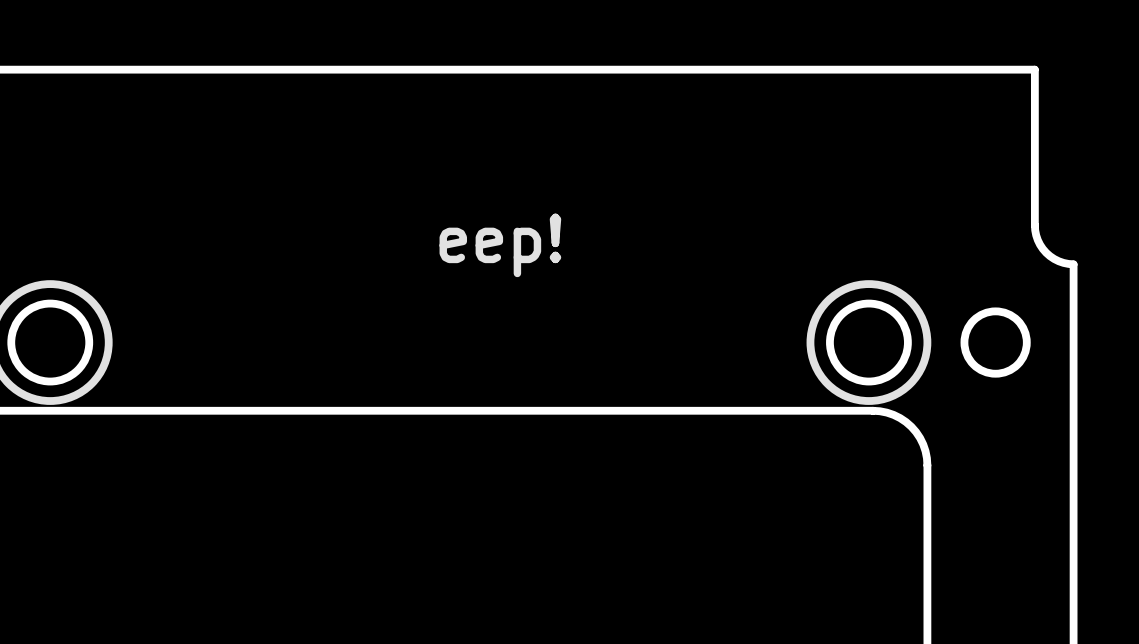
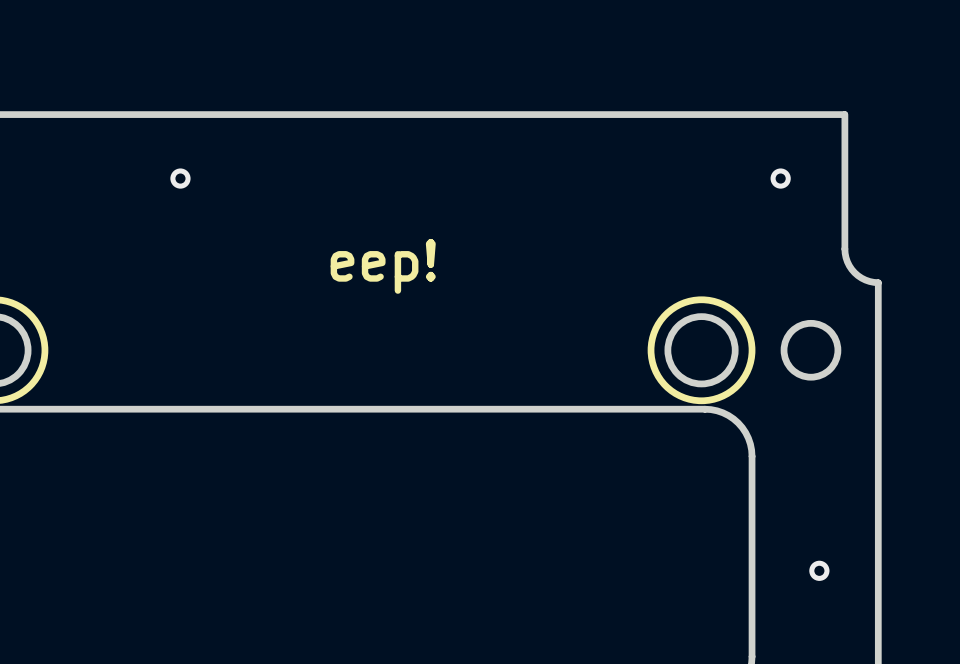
via: none -> (180, 178)
via: none -> (780, 178)
via: none -> (819, 570)

